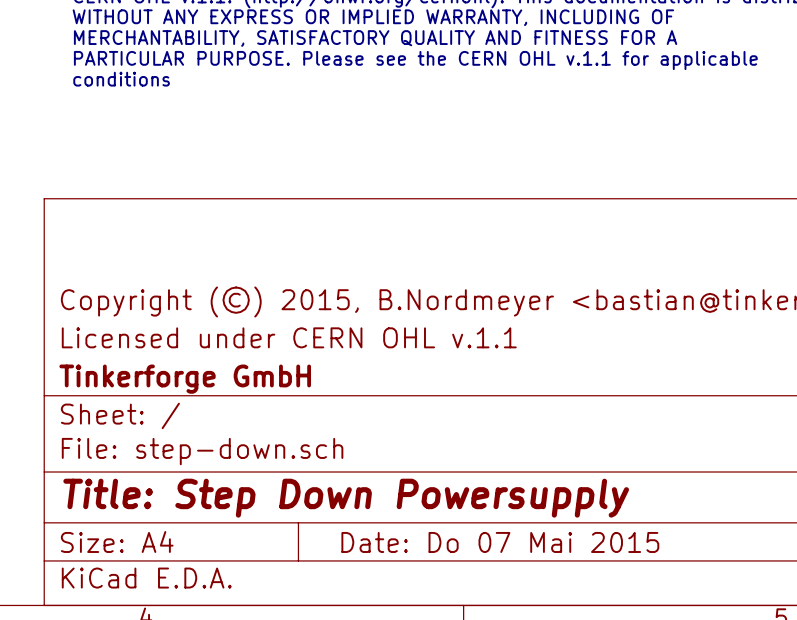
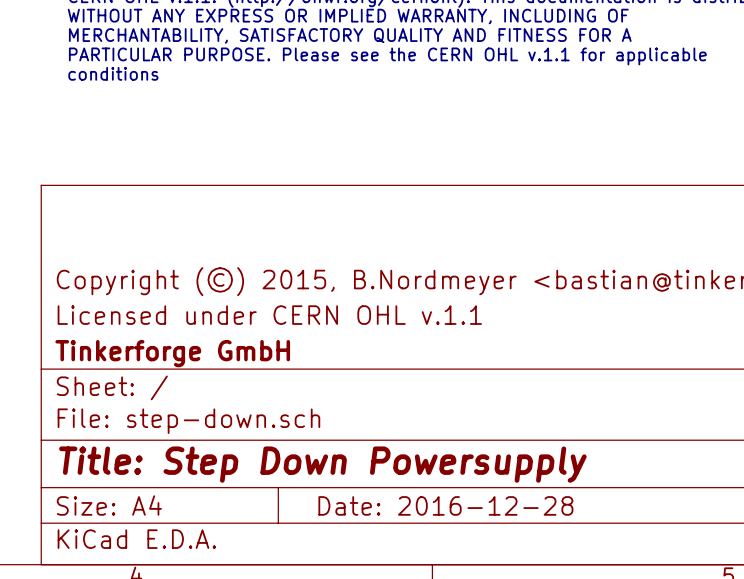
title block: Date: Do 07 Mai 2015 (500, 542) -> Date: 2016-12-28 (445, 505)

